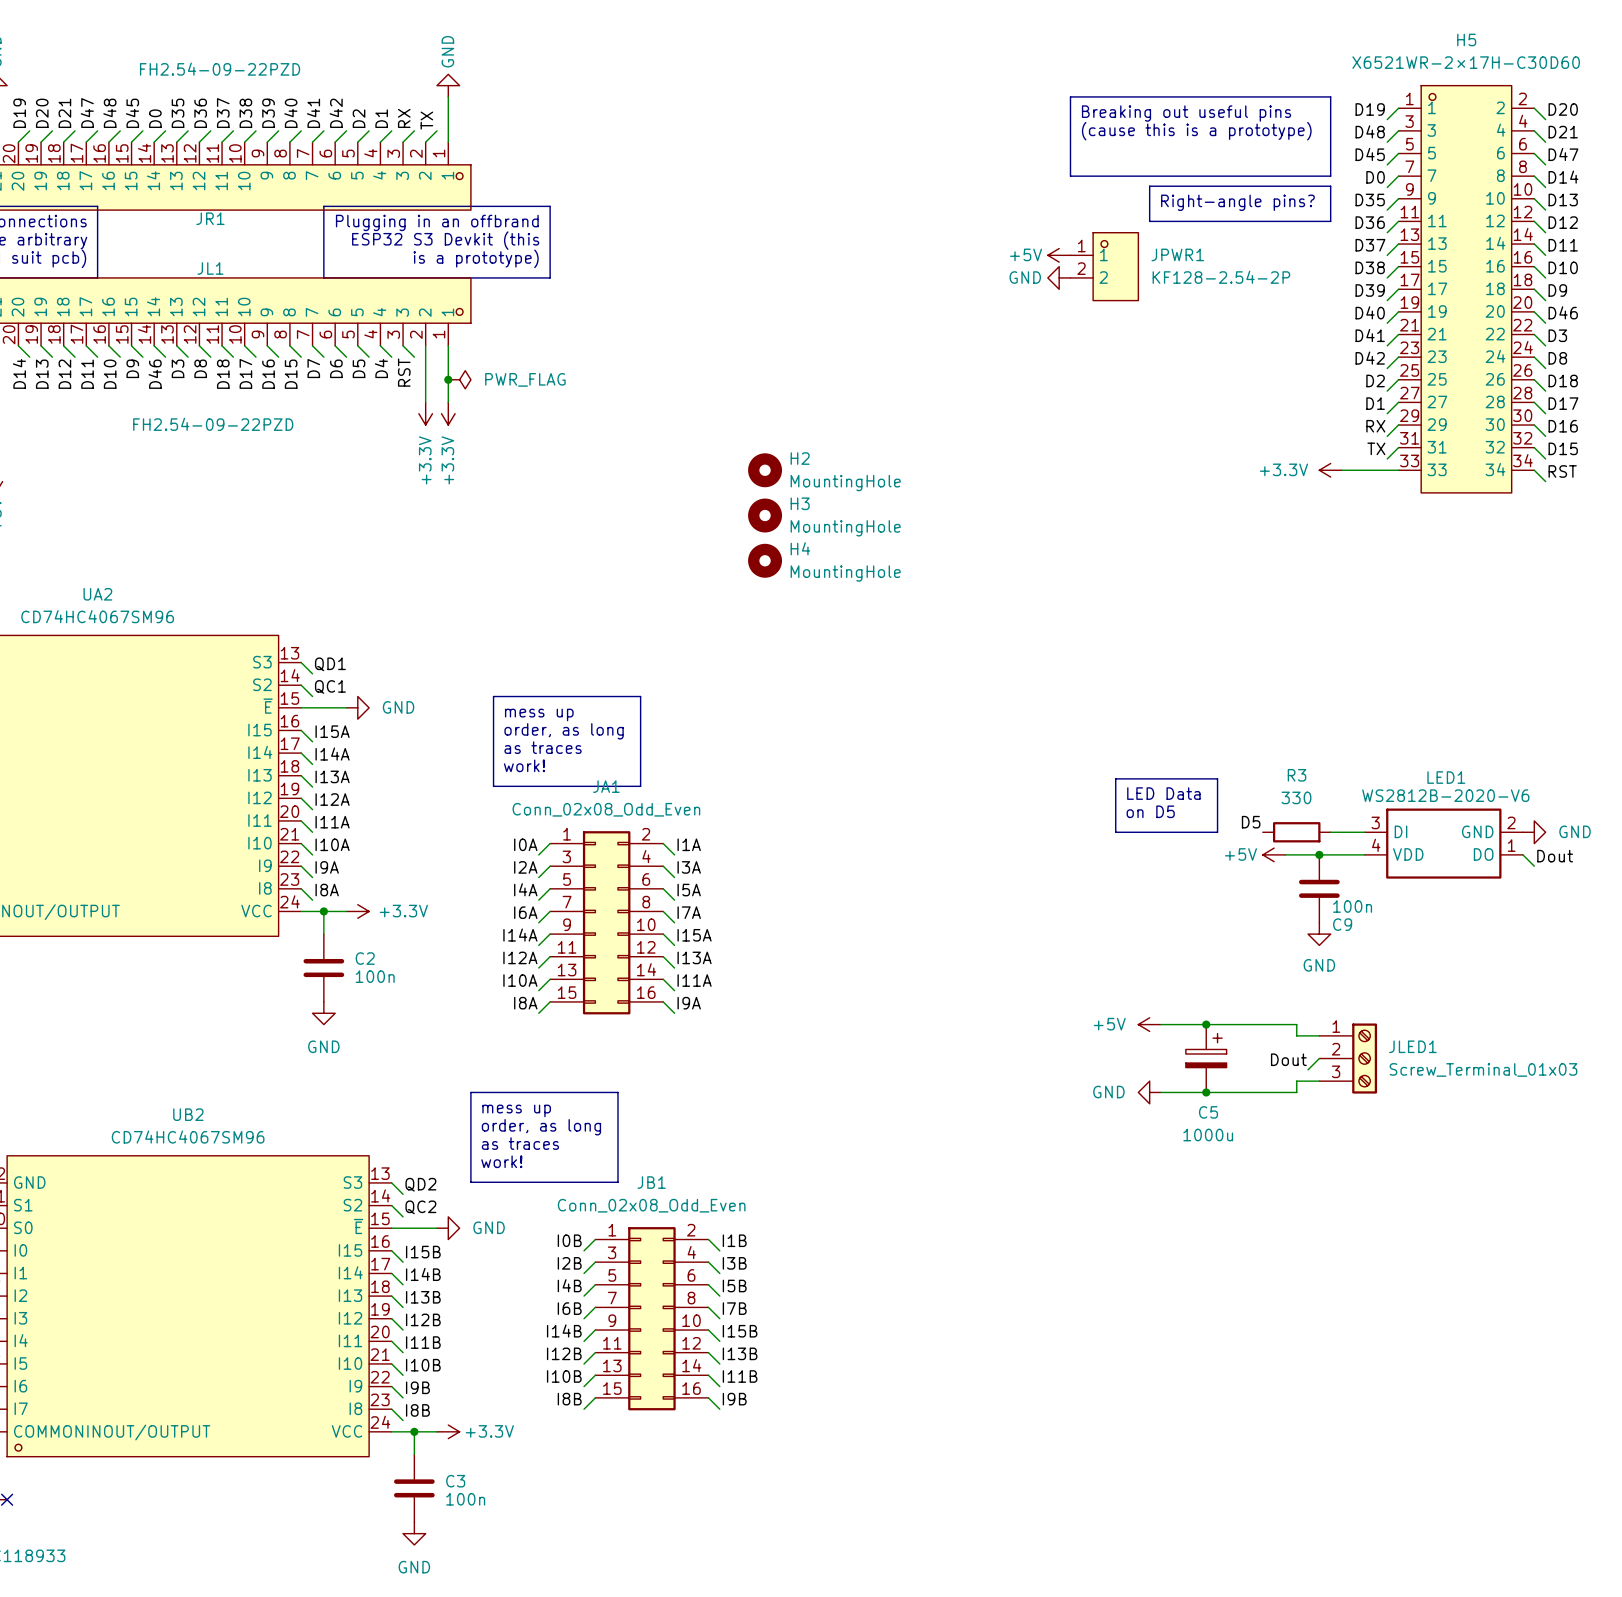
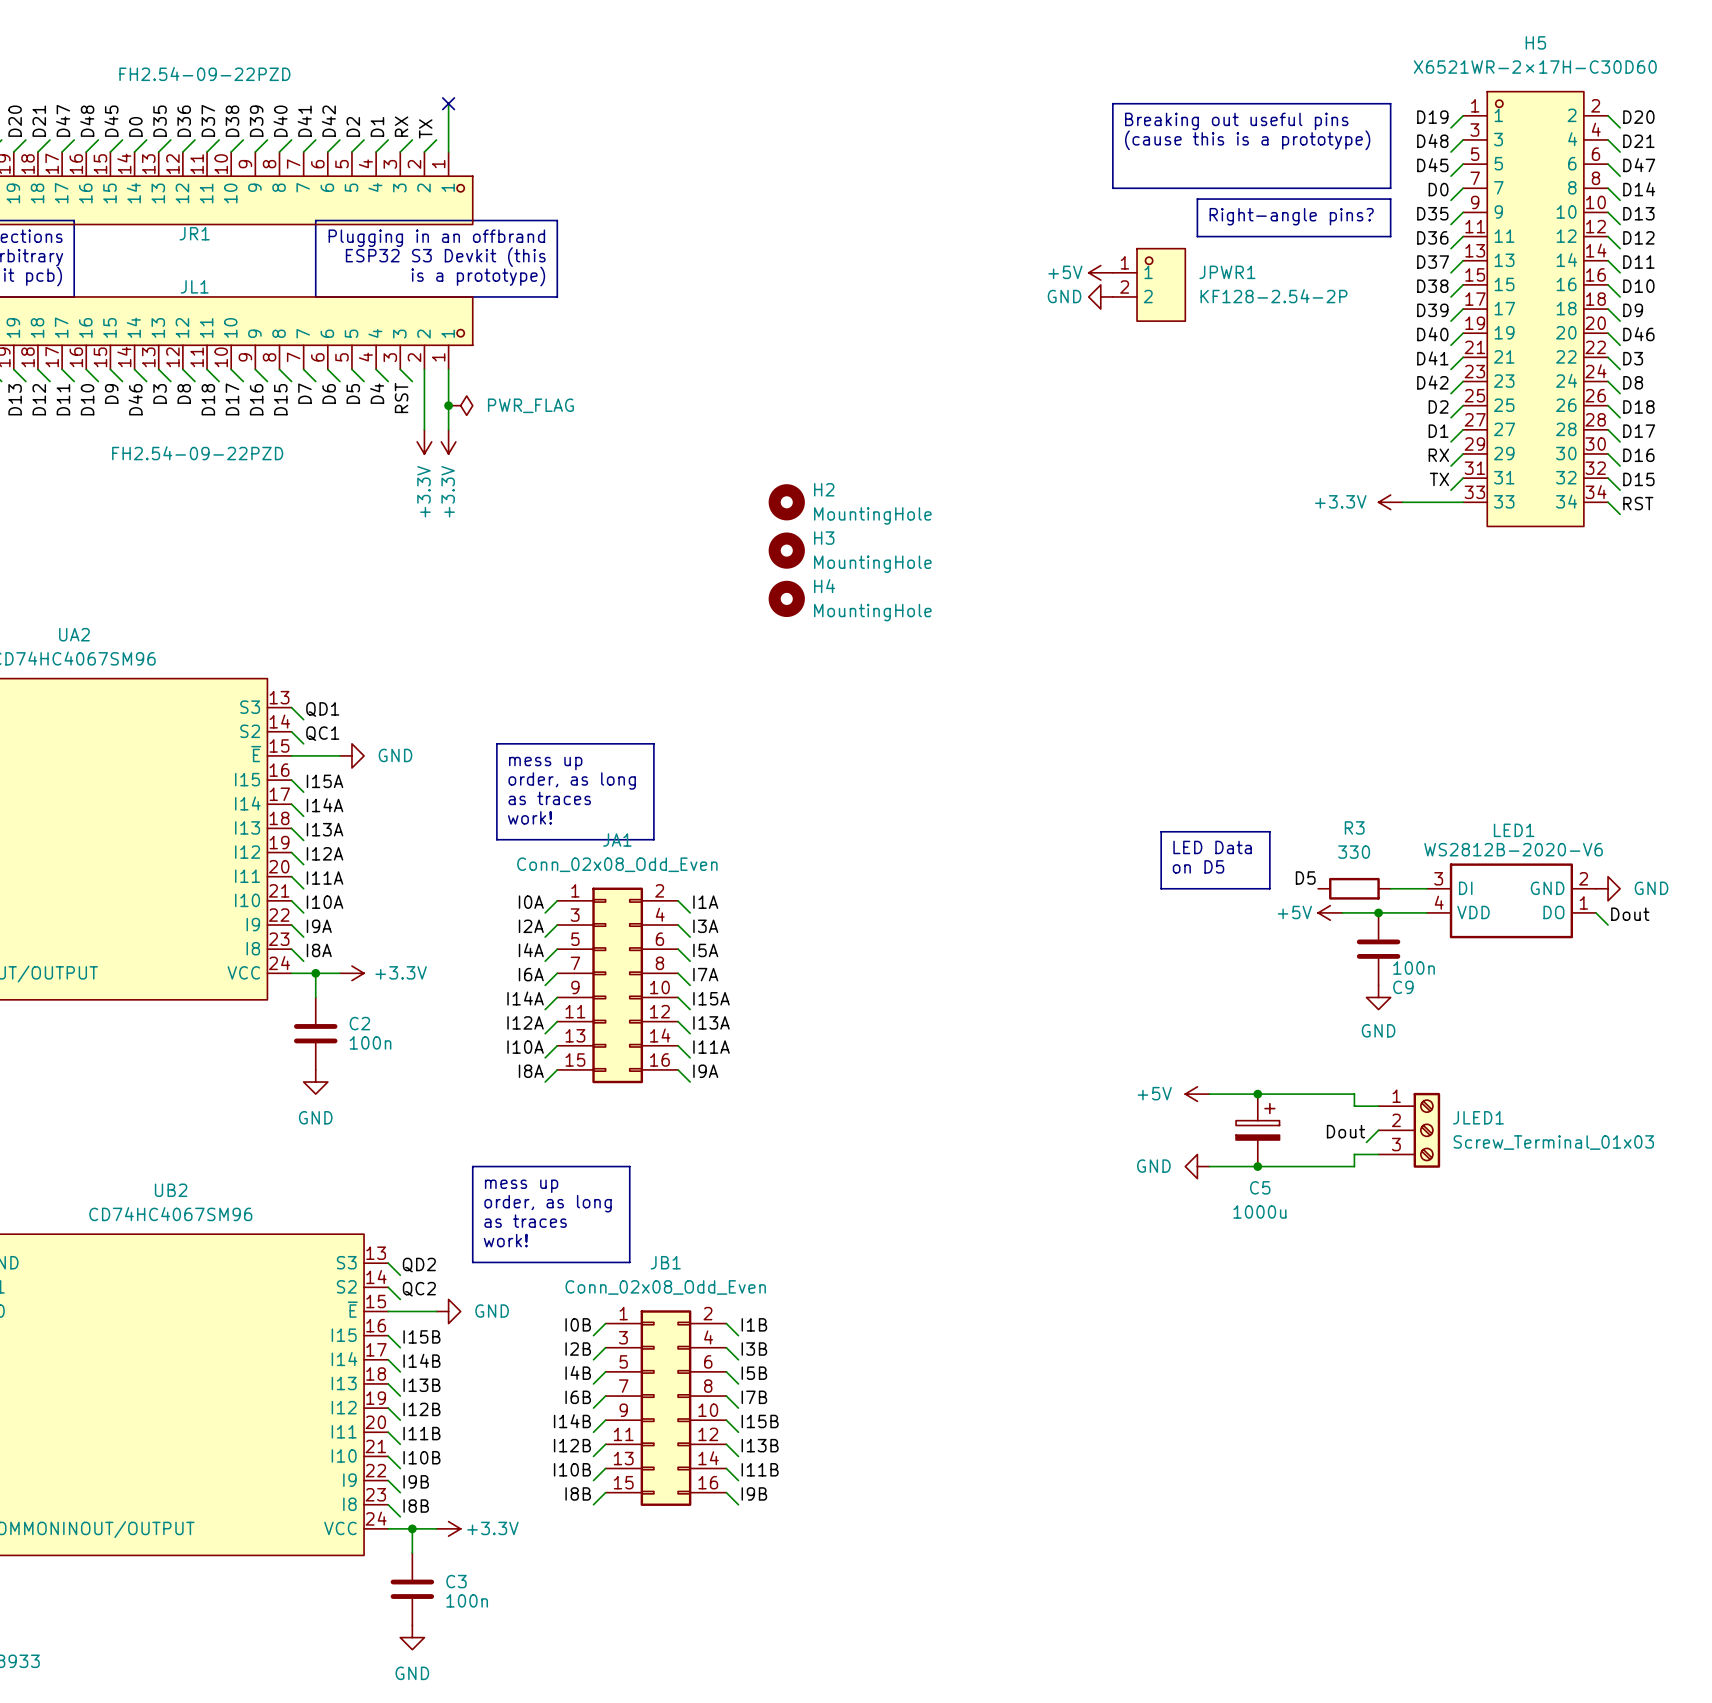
power symbol: GND (448, 85) -> none
no-connect mark: none -> (448, 103)

